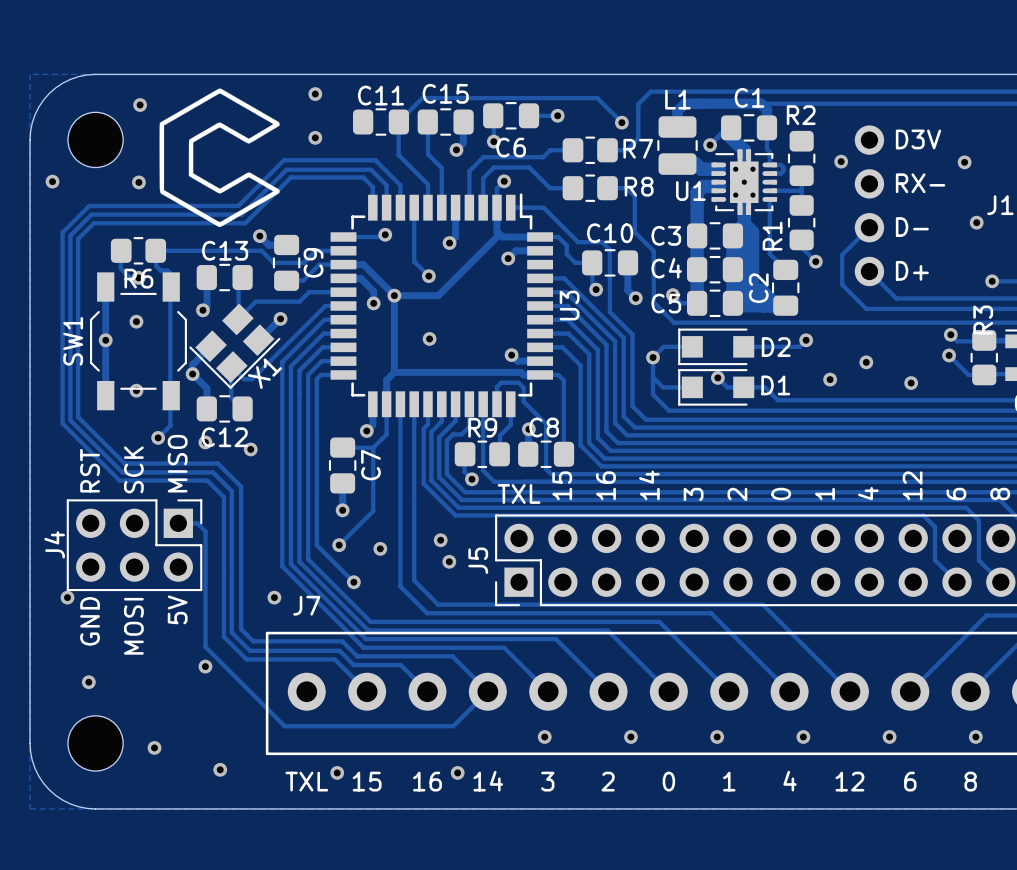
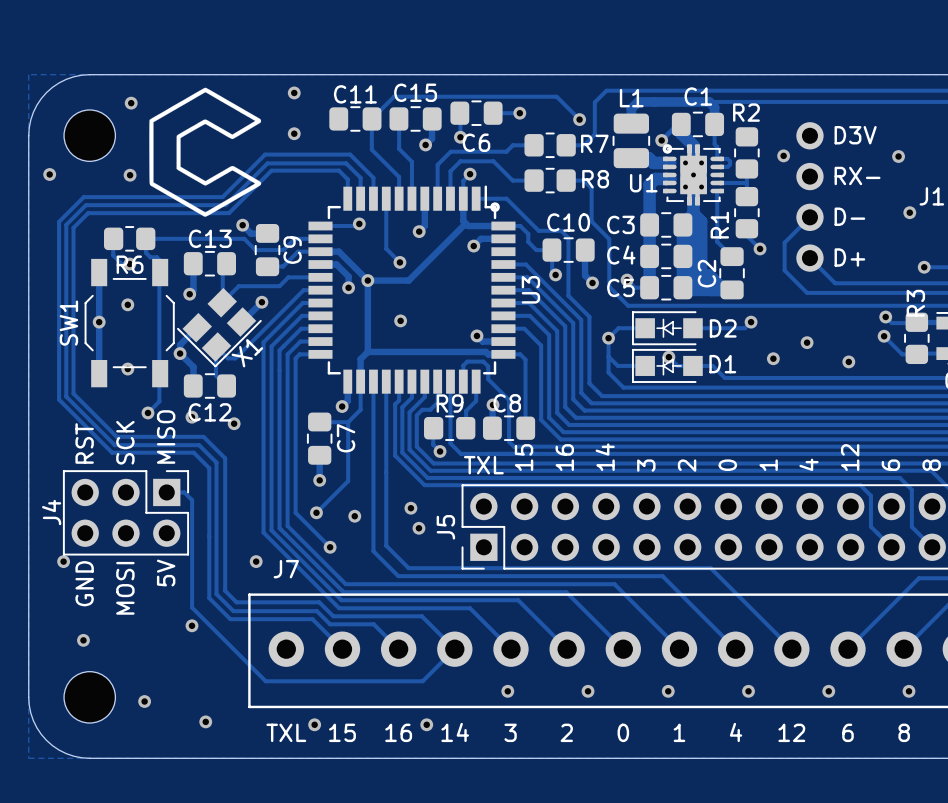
drawing: none -> [662, 144, 673, 154]
drawing: none -> [490, 202, 500, 212]
D2 footprint: [678, 328, 755, 366] -> [631, 311, 703, 346]
D1 footprint: [678, 369, 755, 406] -> [631, 348, 703, 383]

